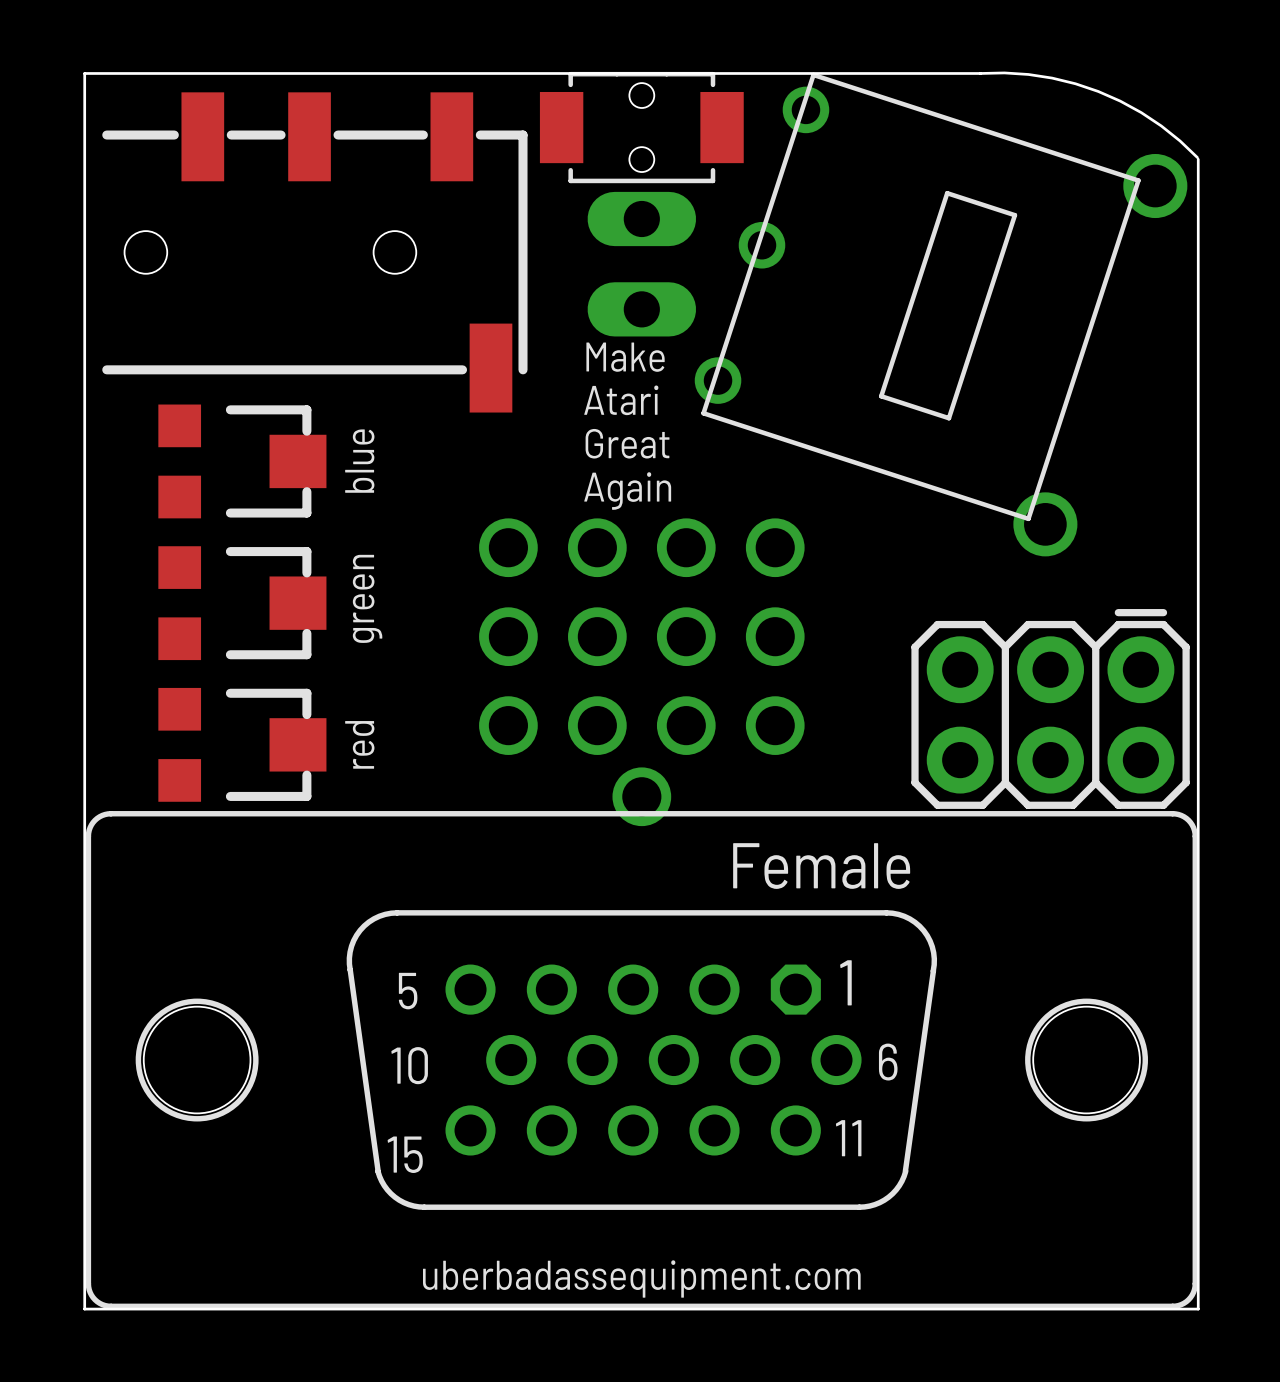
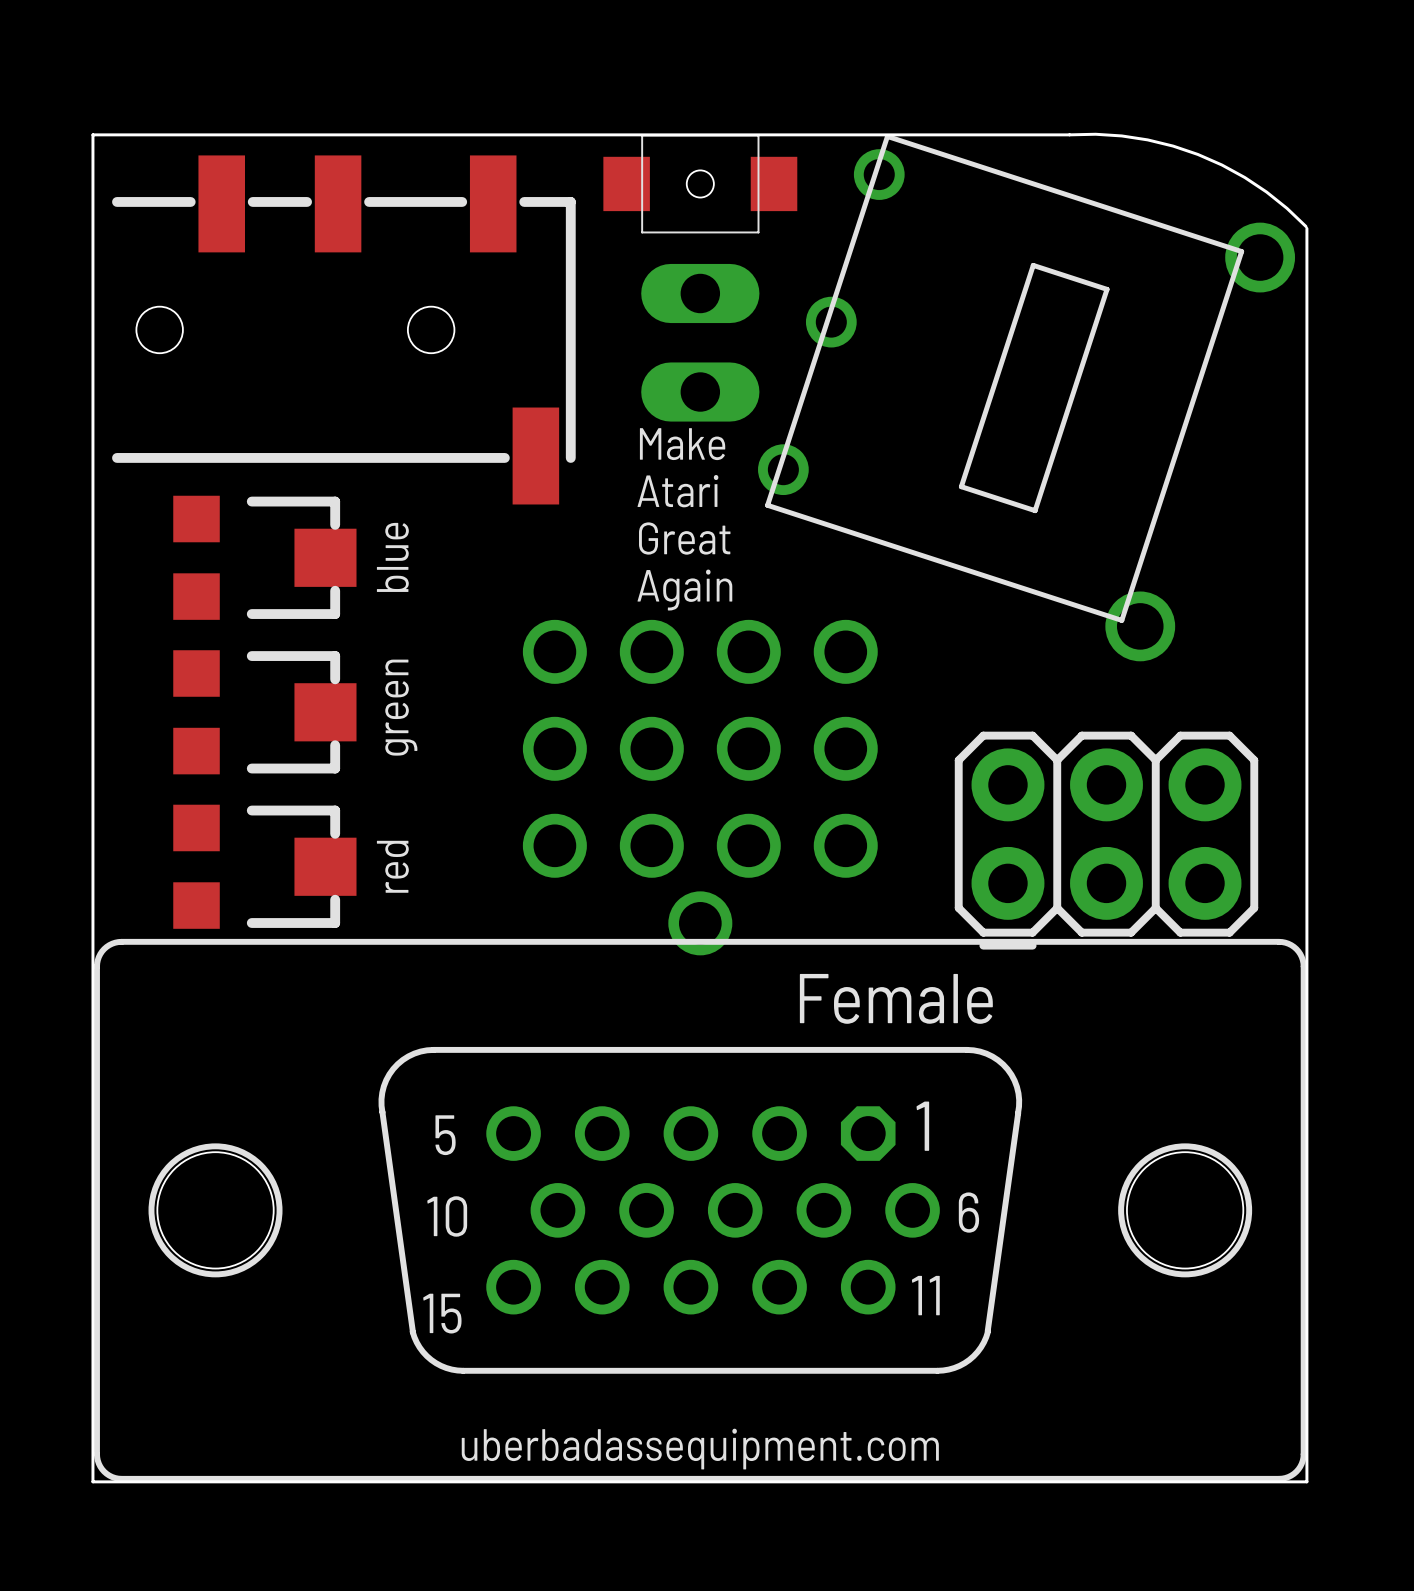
part footprint: [539, 71, 744, 184] -> [603, 134, 798, 234]
part rotation: 0° (1050, 708) -> 180° (1106, 840)

